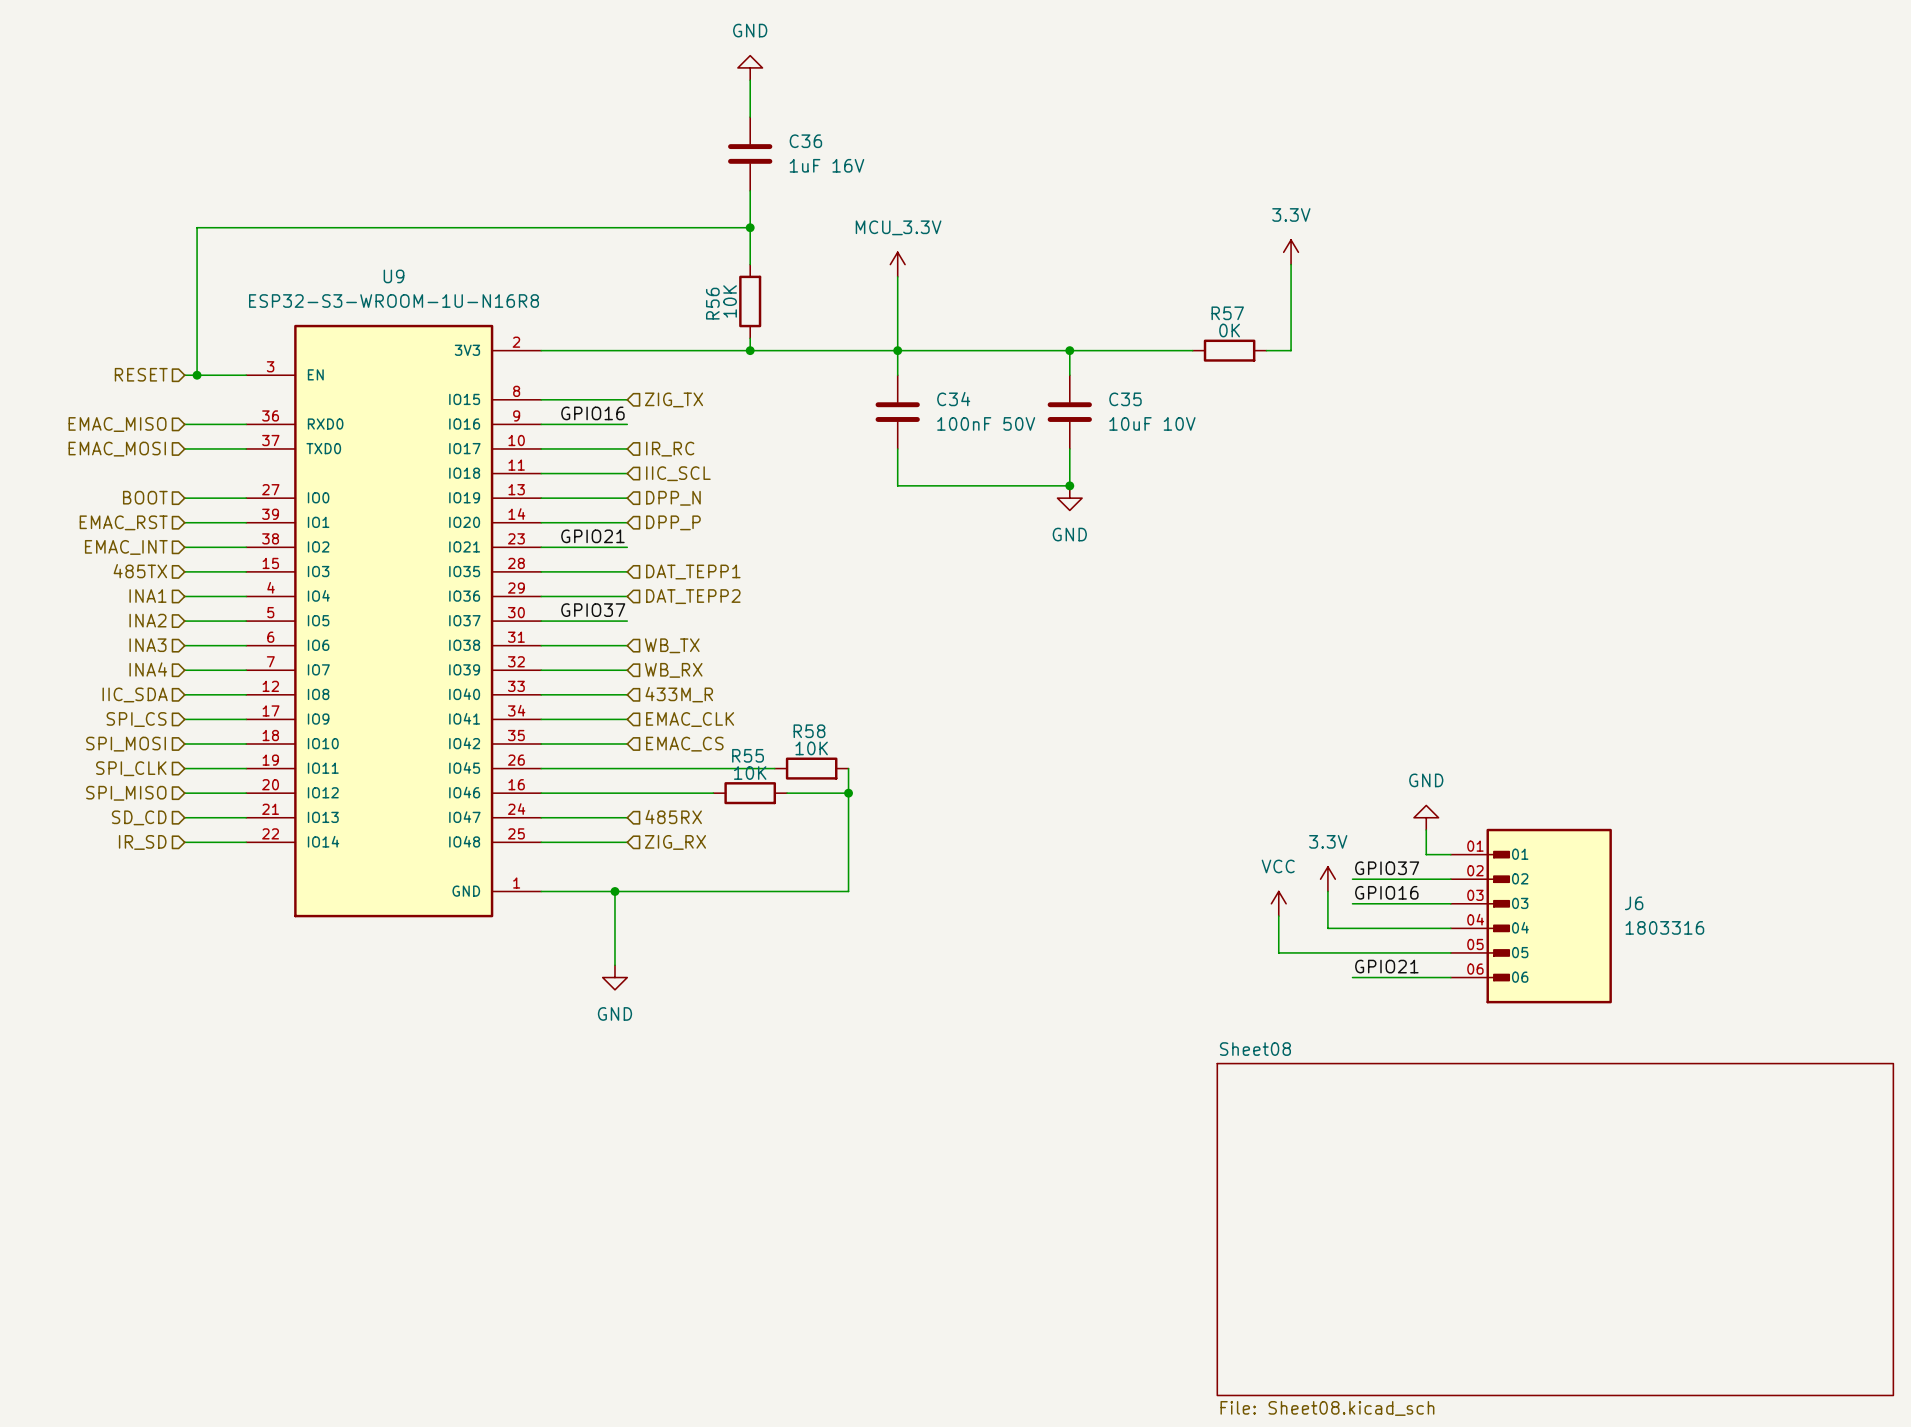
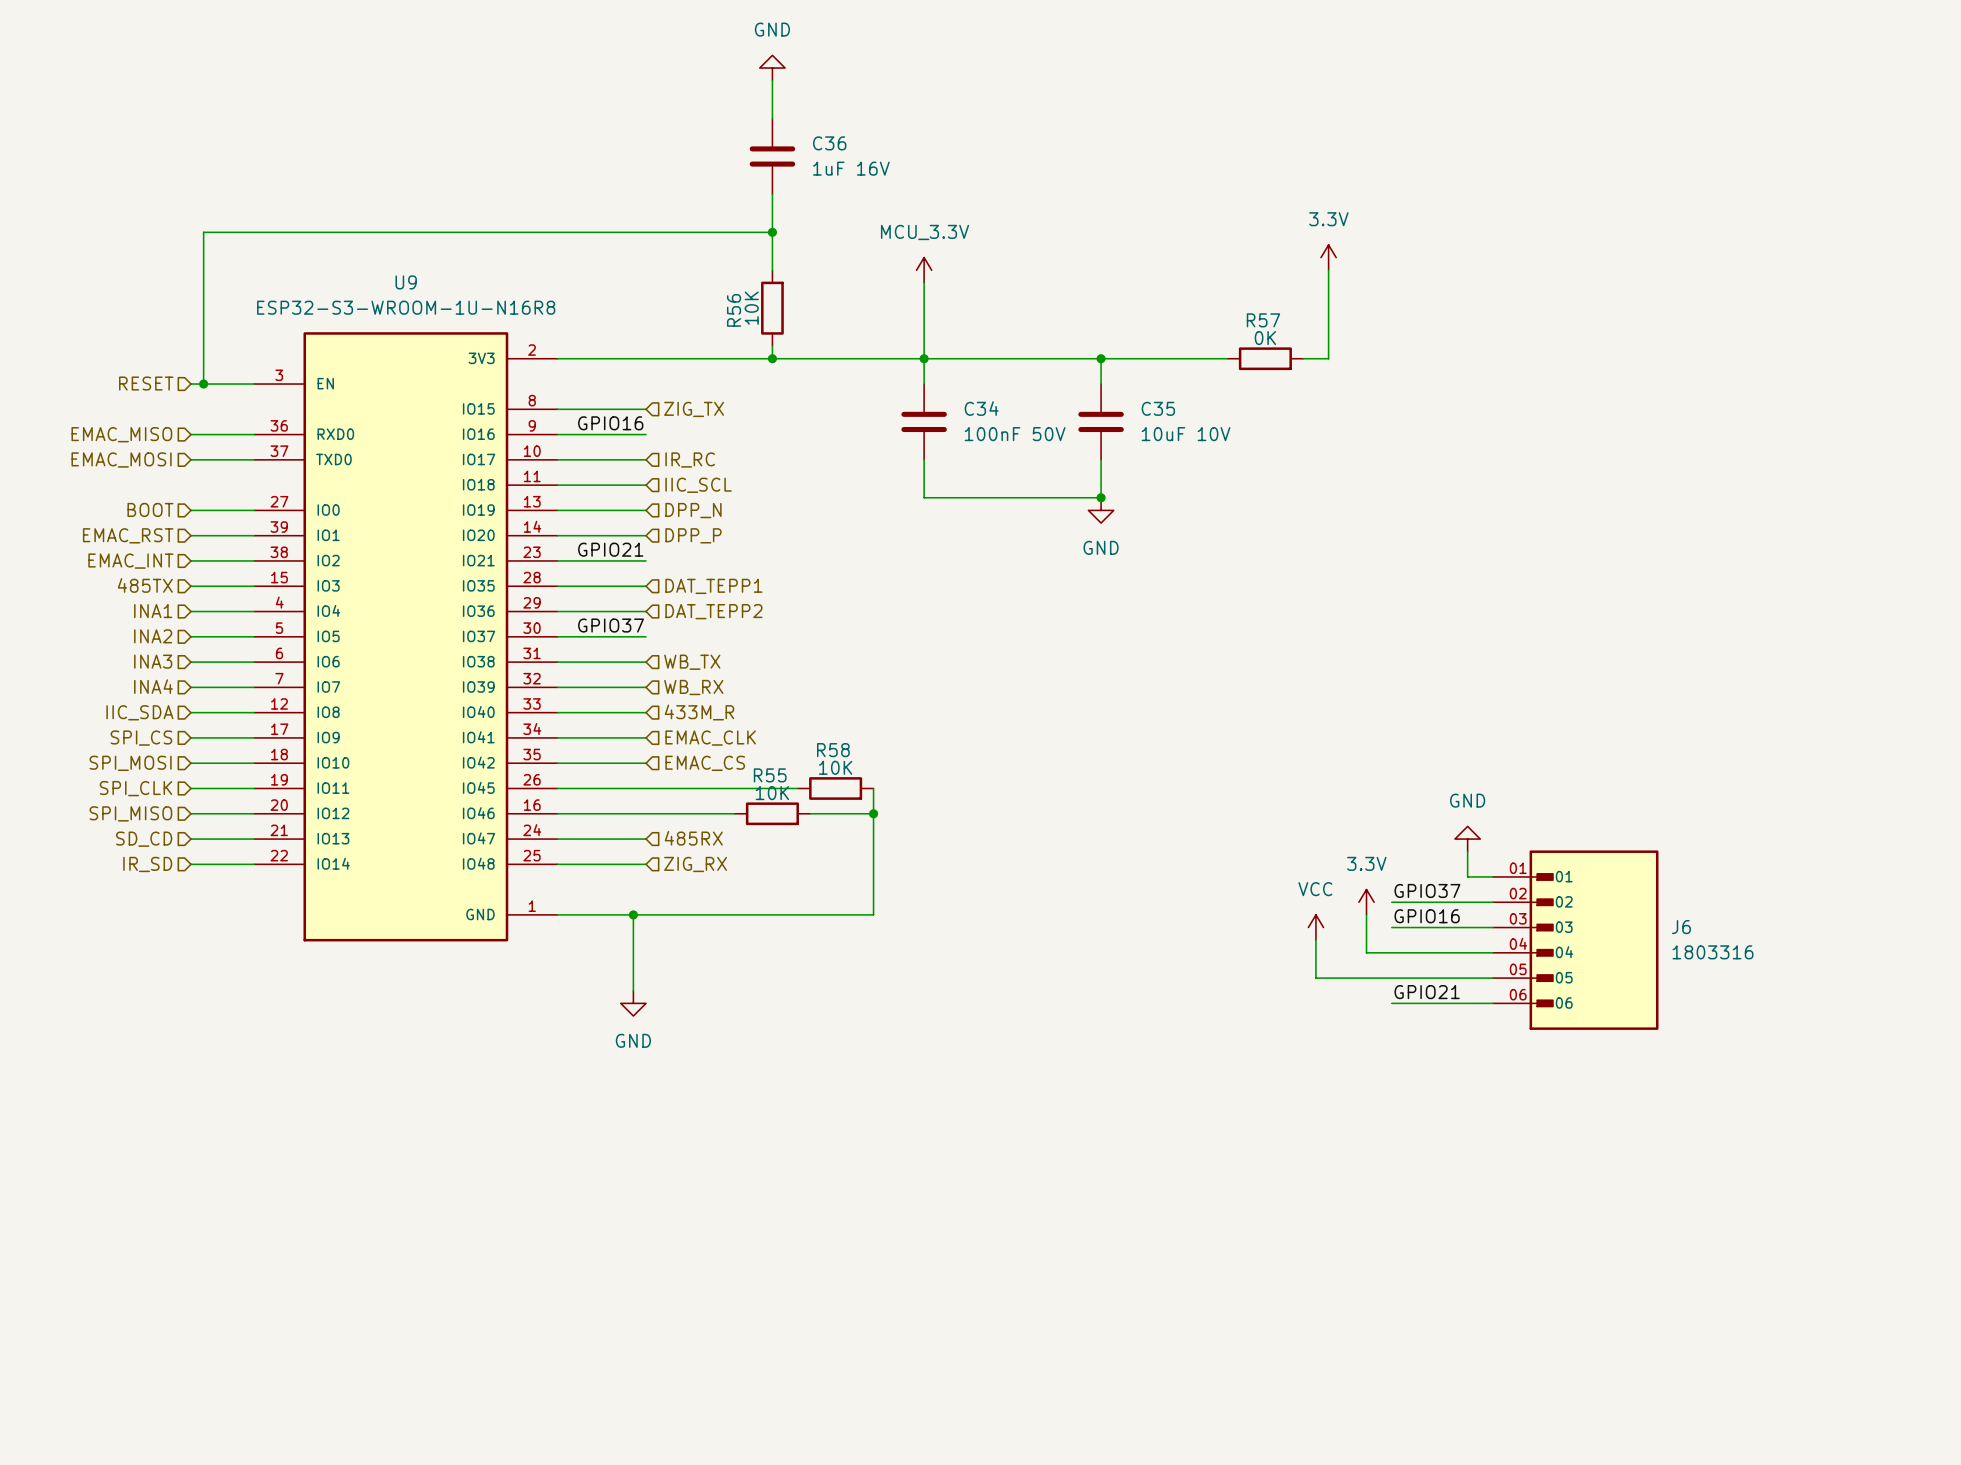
sheet Sheet08: File: Sheet08.kicad_sch (1555, 1229) -> none

